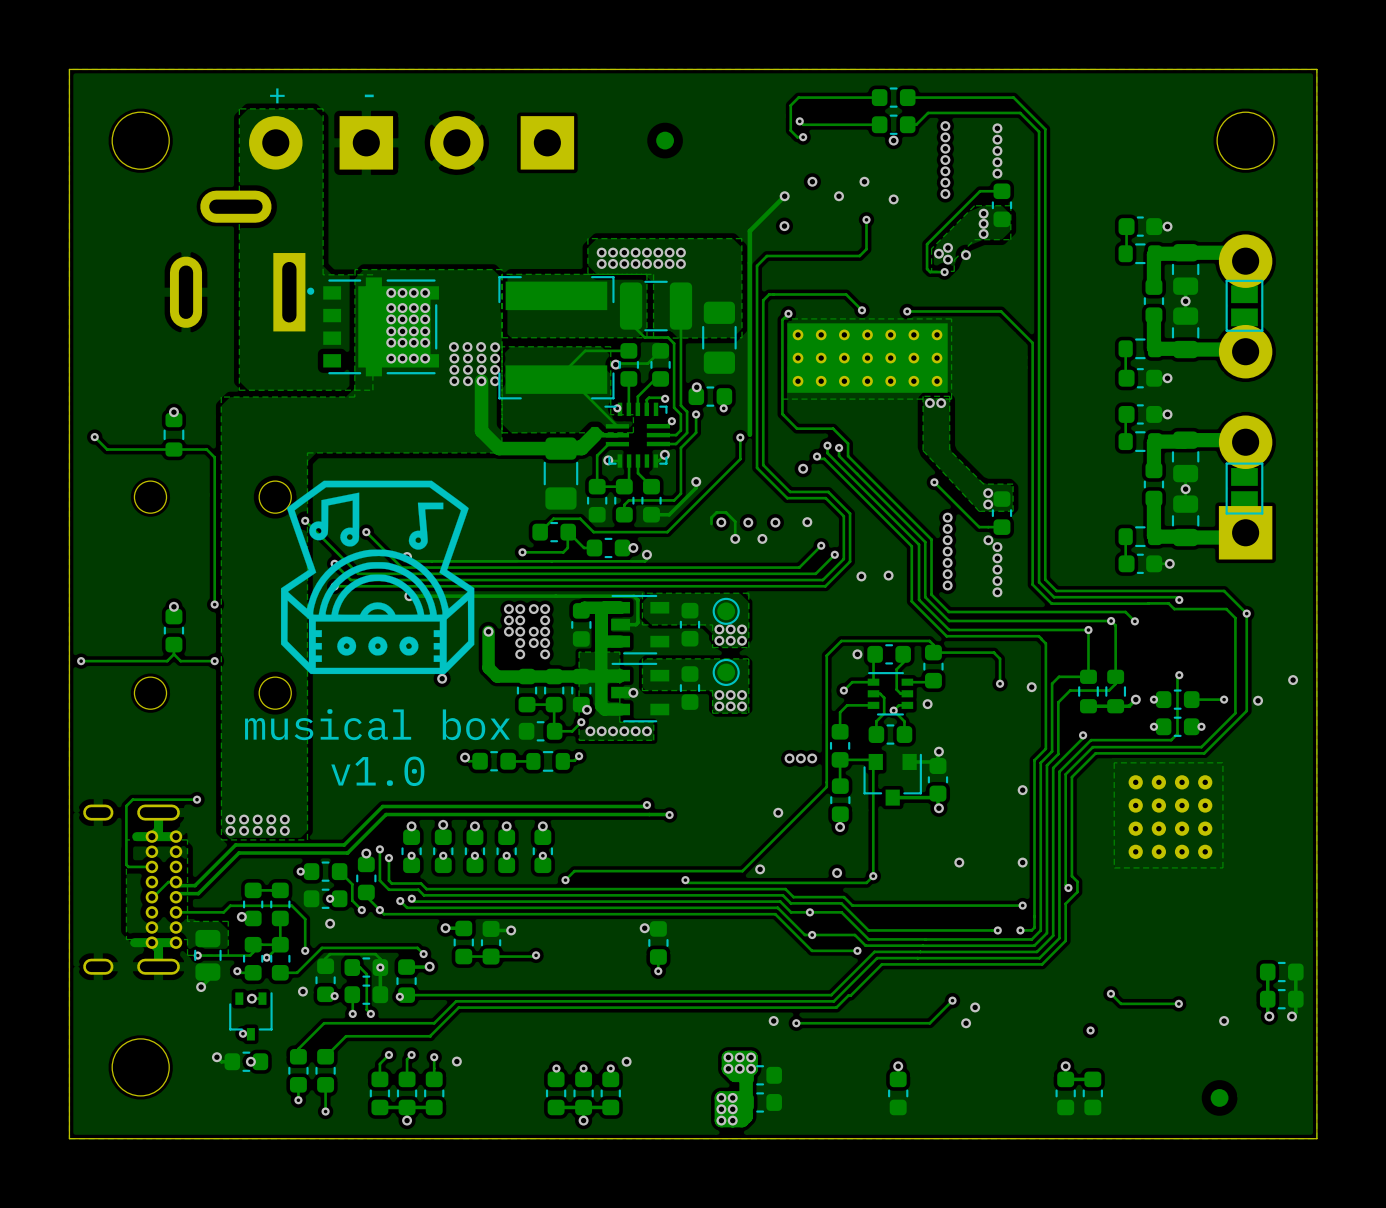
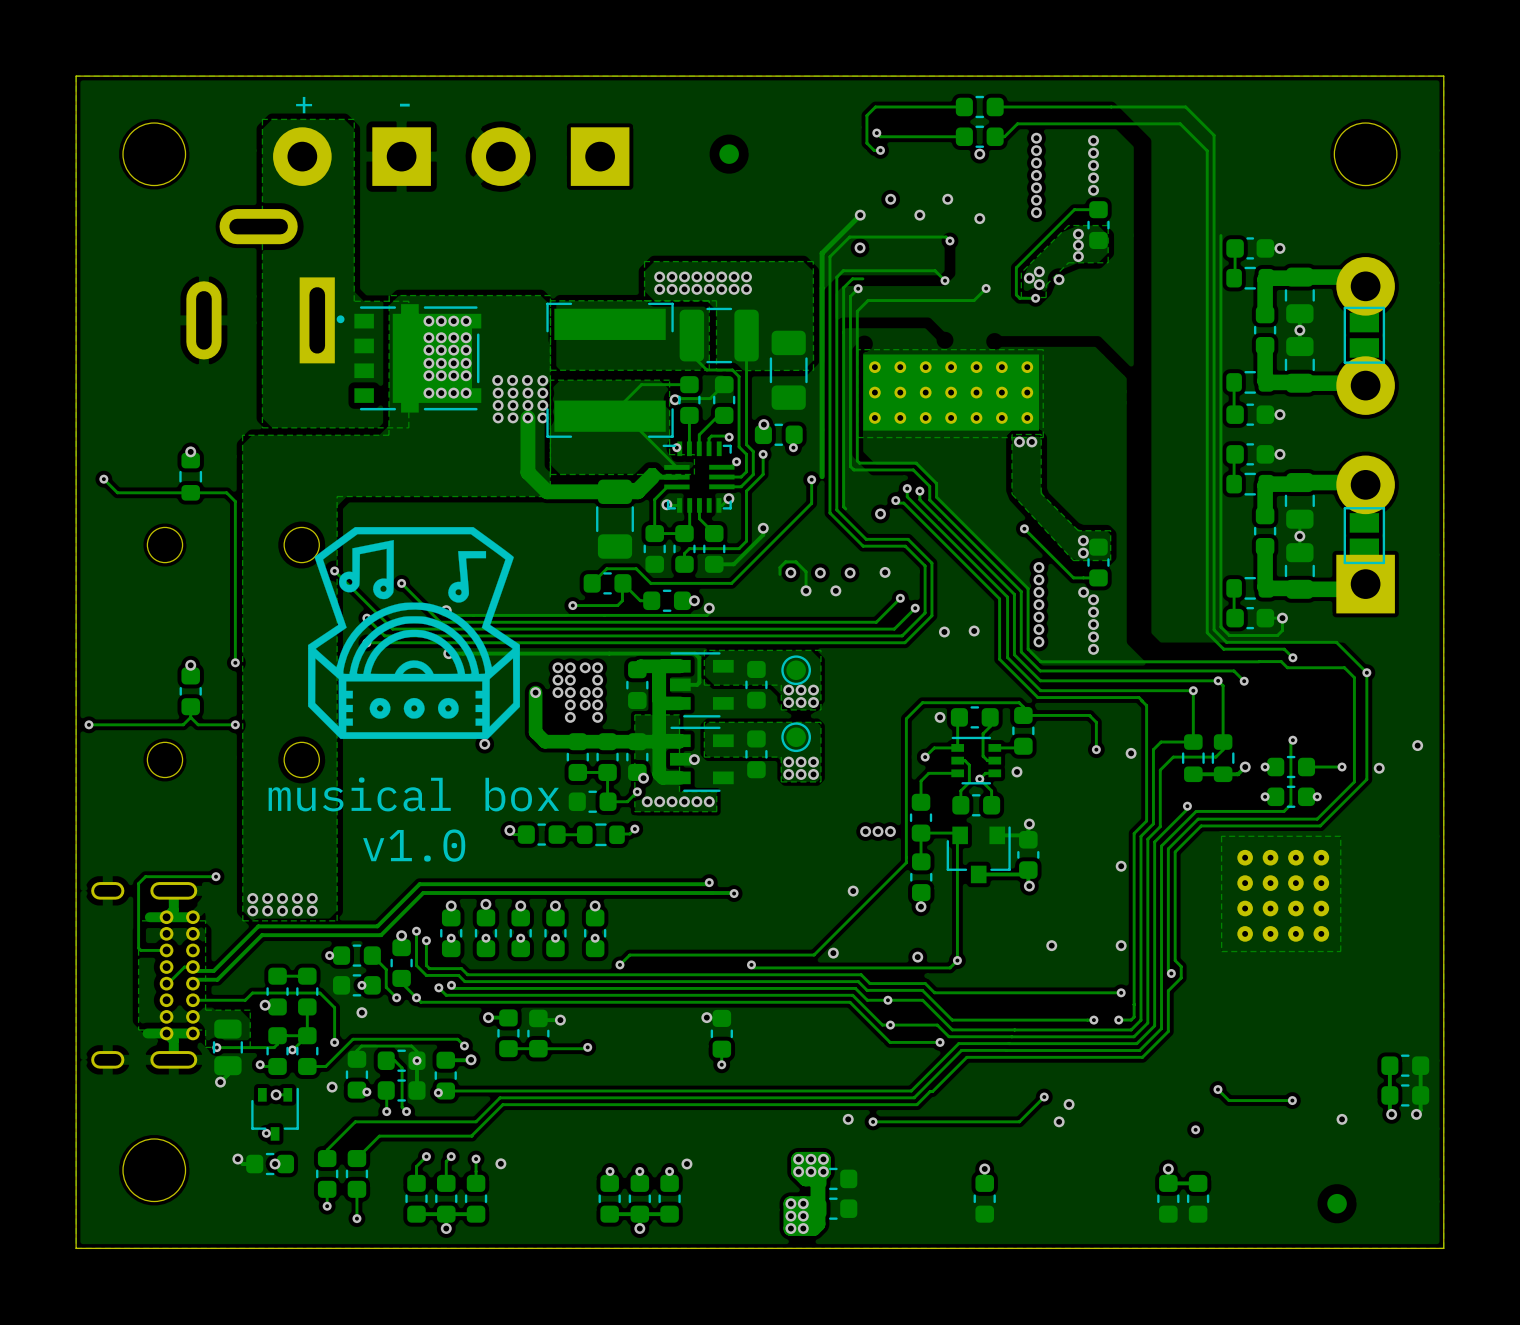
track: (1013, 97) (1045, 129) (1045, 579) (1056, 590) (1224, 590) -> (1111, 106) (1185, 106) (1214, 135) (1214, 629) (1226, 642) (1336, 642) (1342, 647)
track: (1020, 112) (1039, 131) (1039, 582) (1054, 597) (1177, 597) (1179, 599) -> (1118, 123) (1180, 123) (1207, 150) (1207, 632) (1223, 649) (1284, 649) (1292, 657)
track: none -> (1220, 235) (1220, 627) (1229, 635) (1277, 635) (1282, 630) (1282, 618)
track: (866, 219) (866, 249) (859, 256) (766, 256) (757, 265) -> (949, 240) (946, 237) (849, 237) (829, 256) (829, 291)
track: none -> (862, 278) (852, 278) (843, 287) (843, 506) (845, 508)
via: none -> (945, 280)
via: none -> (858, 288)
via: none -> (986, 288)
track: (763, 300) (769, 294) (846, 294) (861, 310) -> (836, 329) (836, 277) (843, 270) (935, 270) (945, 280)
via: (861, 310) -> none
track: (907, 311) (1001, 311) (1032, 342) (1032, 584) (1051, 603) -> (986, 288) (974, 300) (868, 300) (857, 311) (857, 460) (859, 463) (916, 463) (936, 483) (936, 497) (1028, 588) (1028, 649) (1040, 661) (1152, 661)
via: (907, 311) -> none
track: (788, 313) (782, 319) (782, 414) (796, 428) -> (858, 288) (850, 296) (850, 466) (853, 469) (873, 469)
via: (788, 313) -> none

